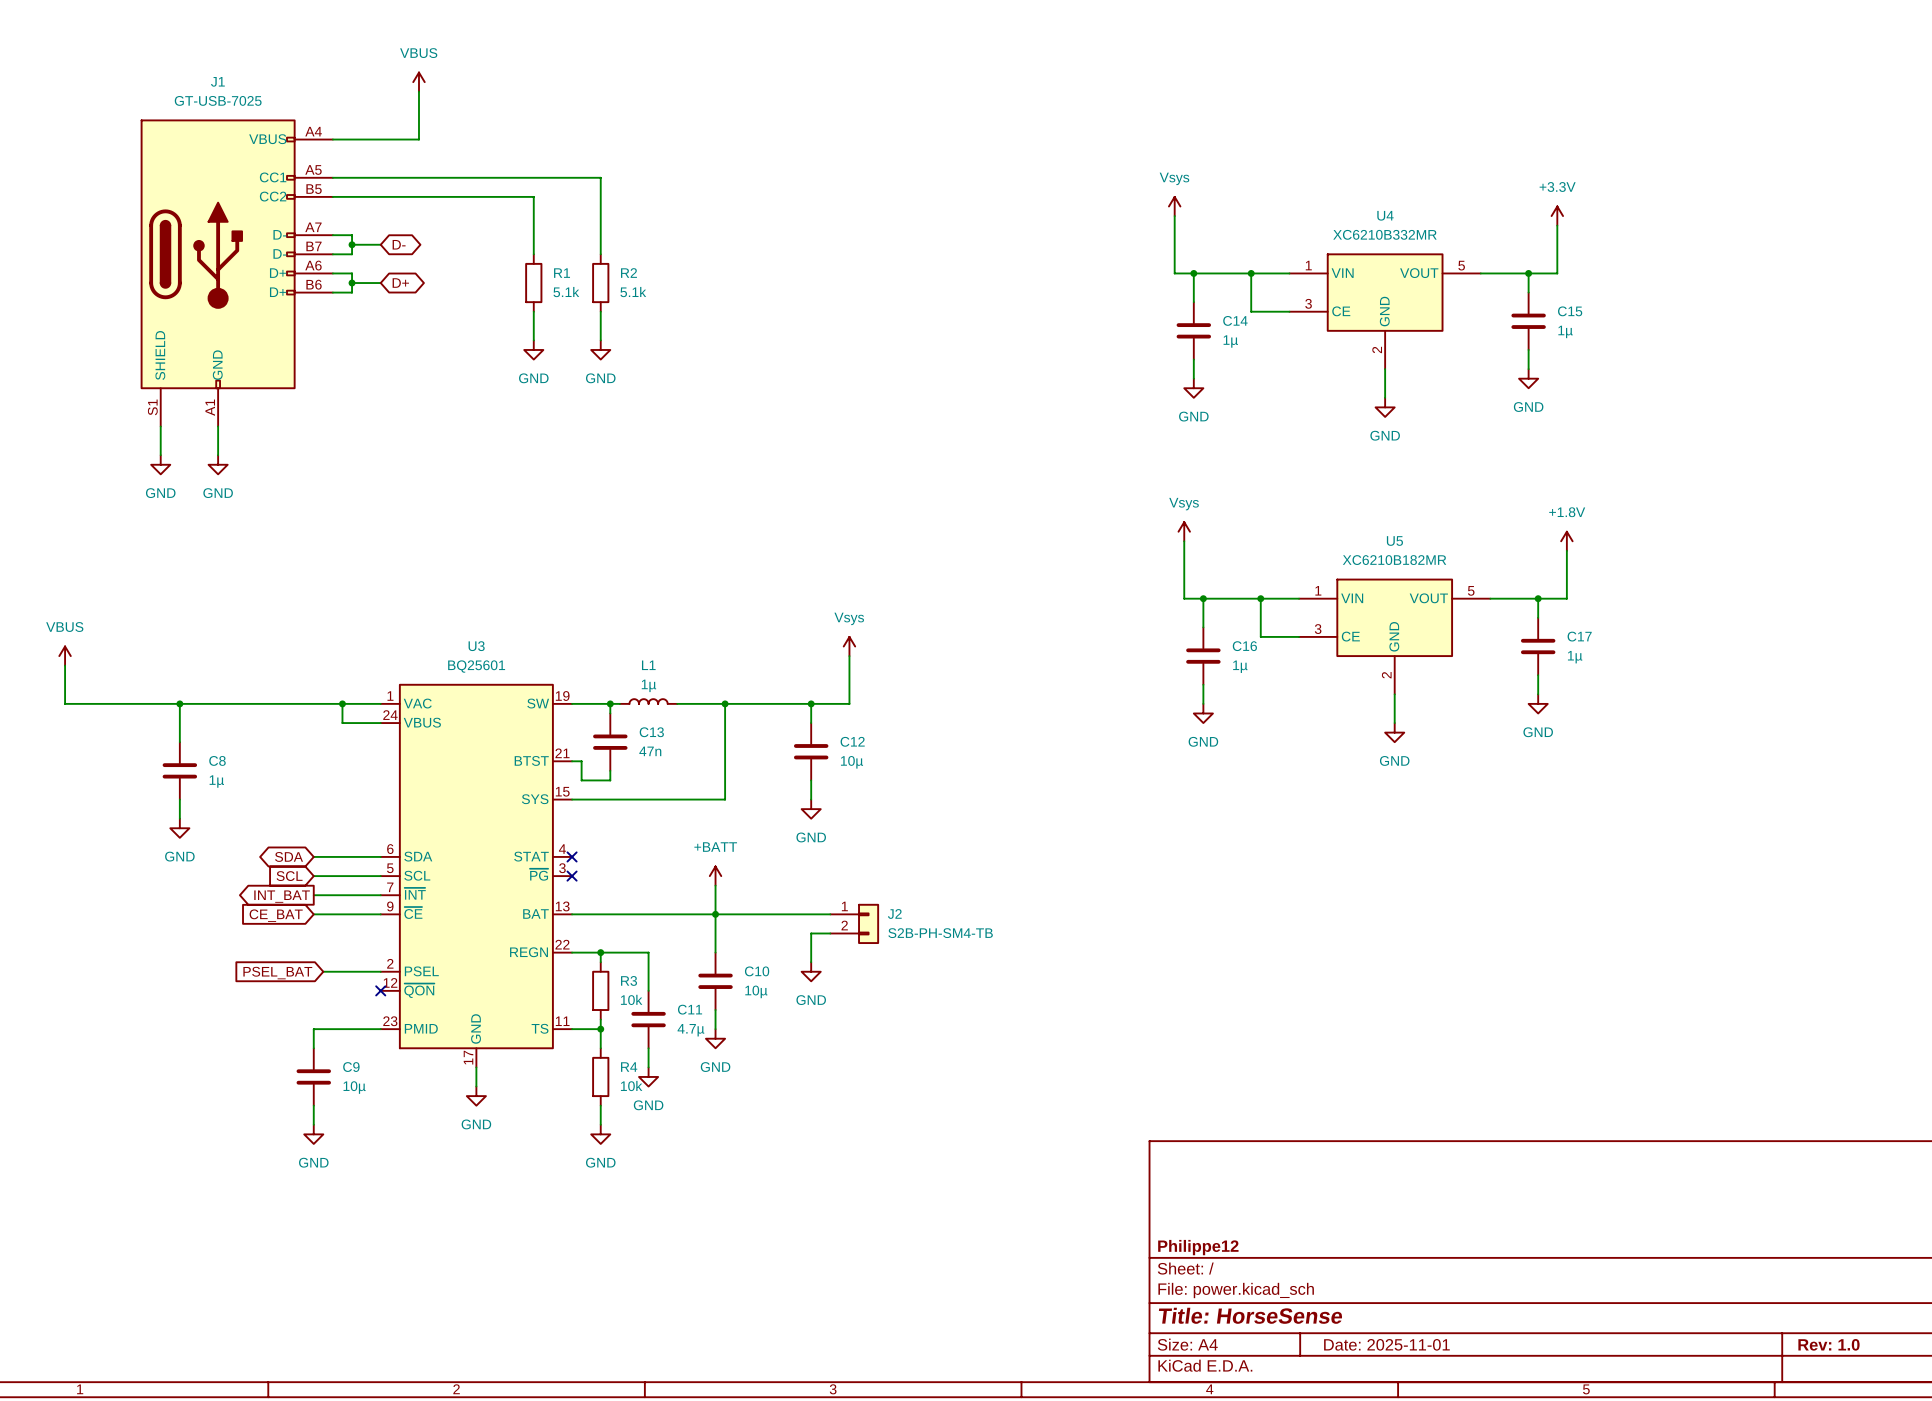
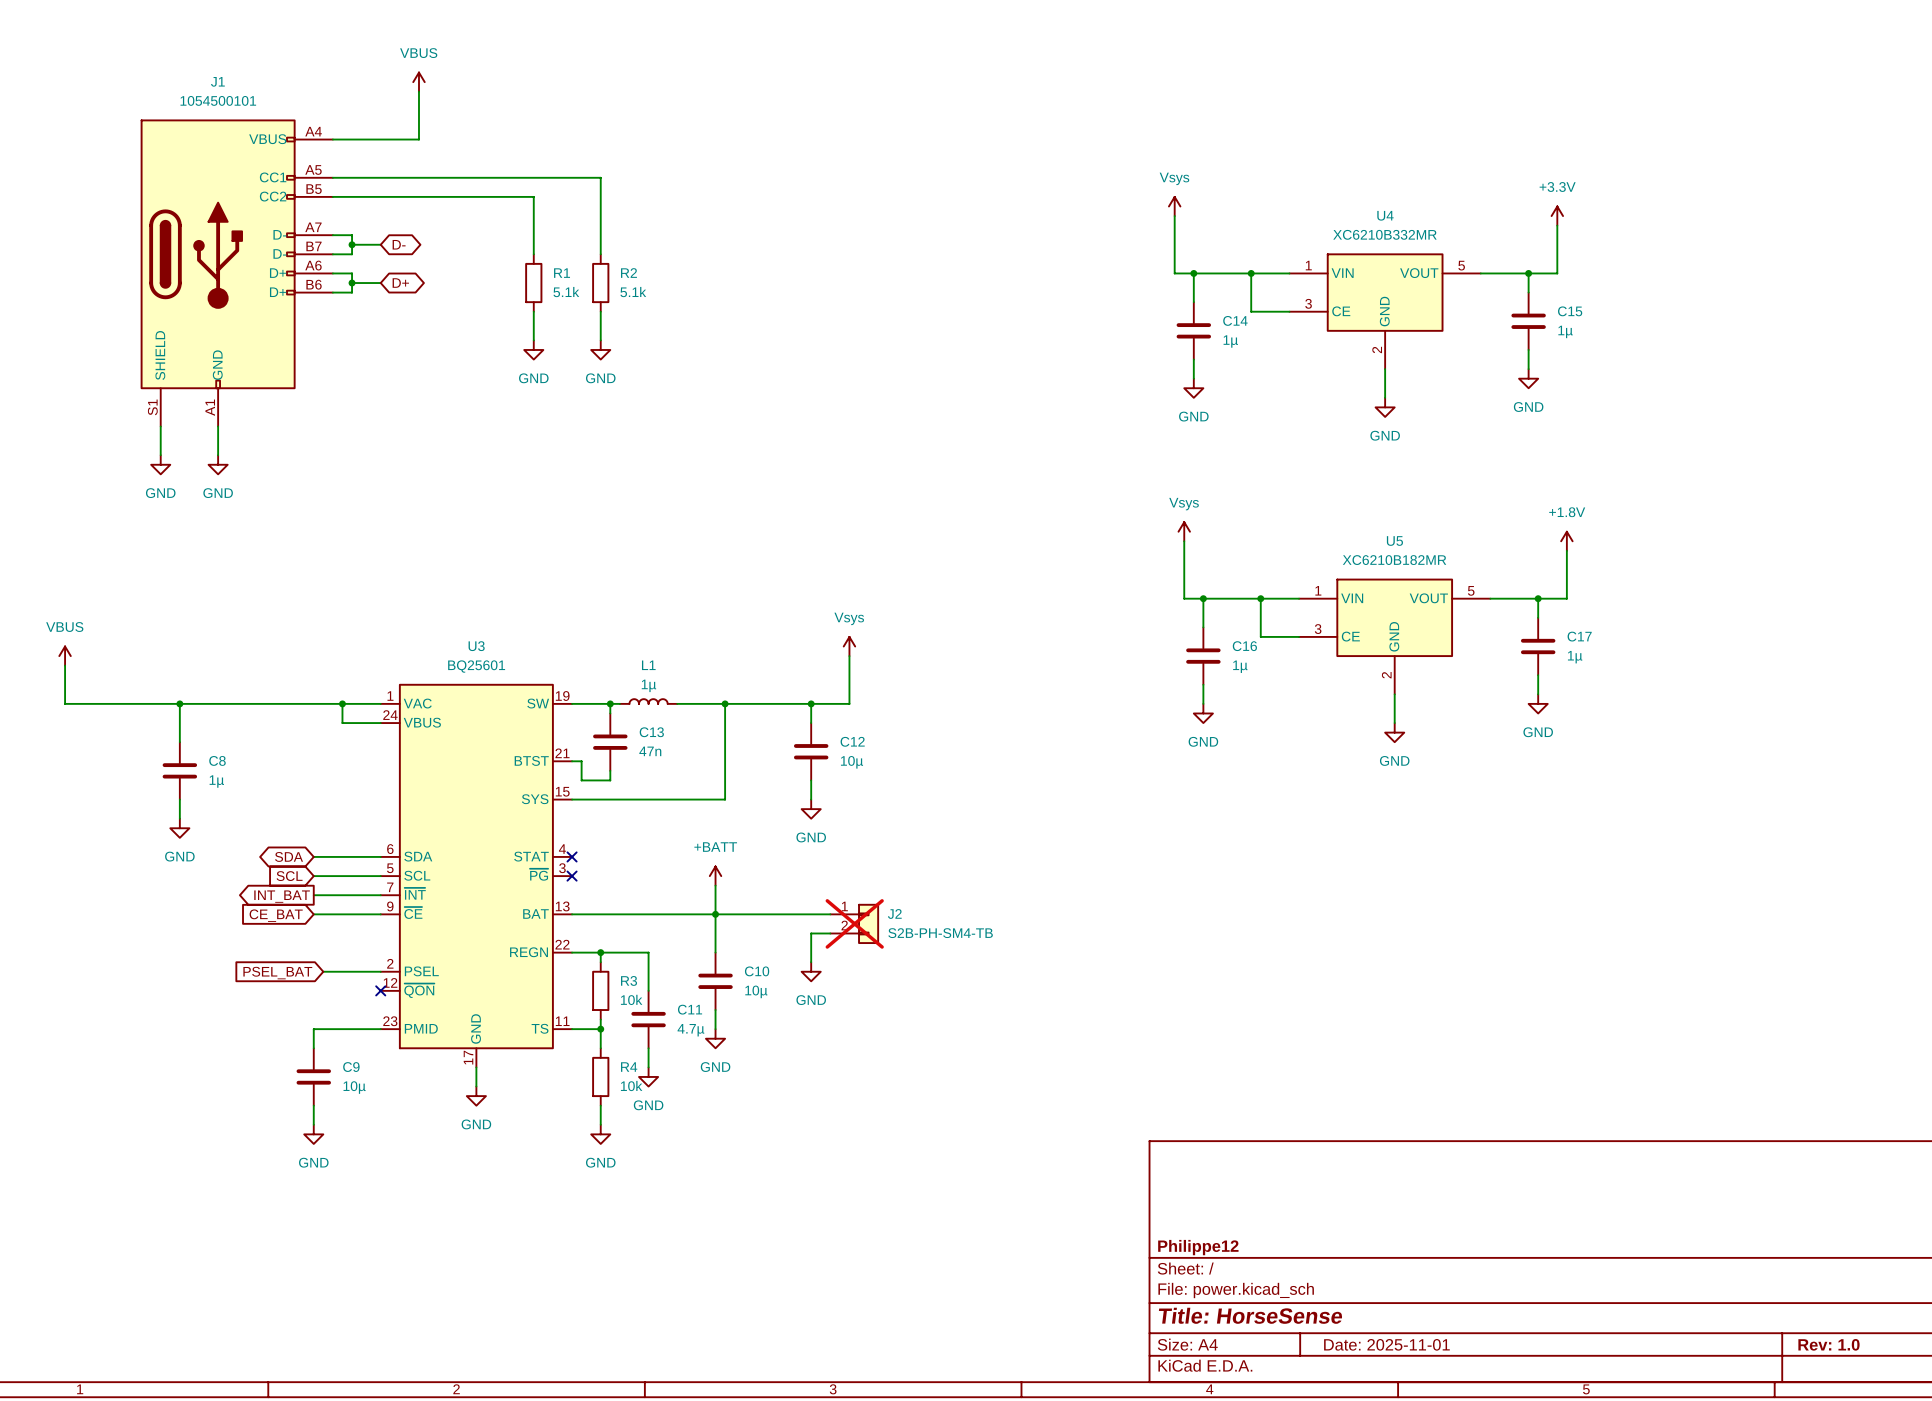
J1 value: GT-USB-7025 (218, 100) -> 1054500101 (218, 100)
J2 do-not-place cross: none -> (854, 923)

